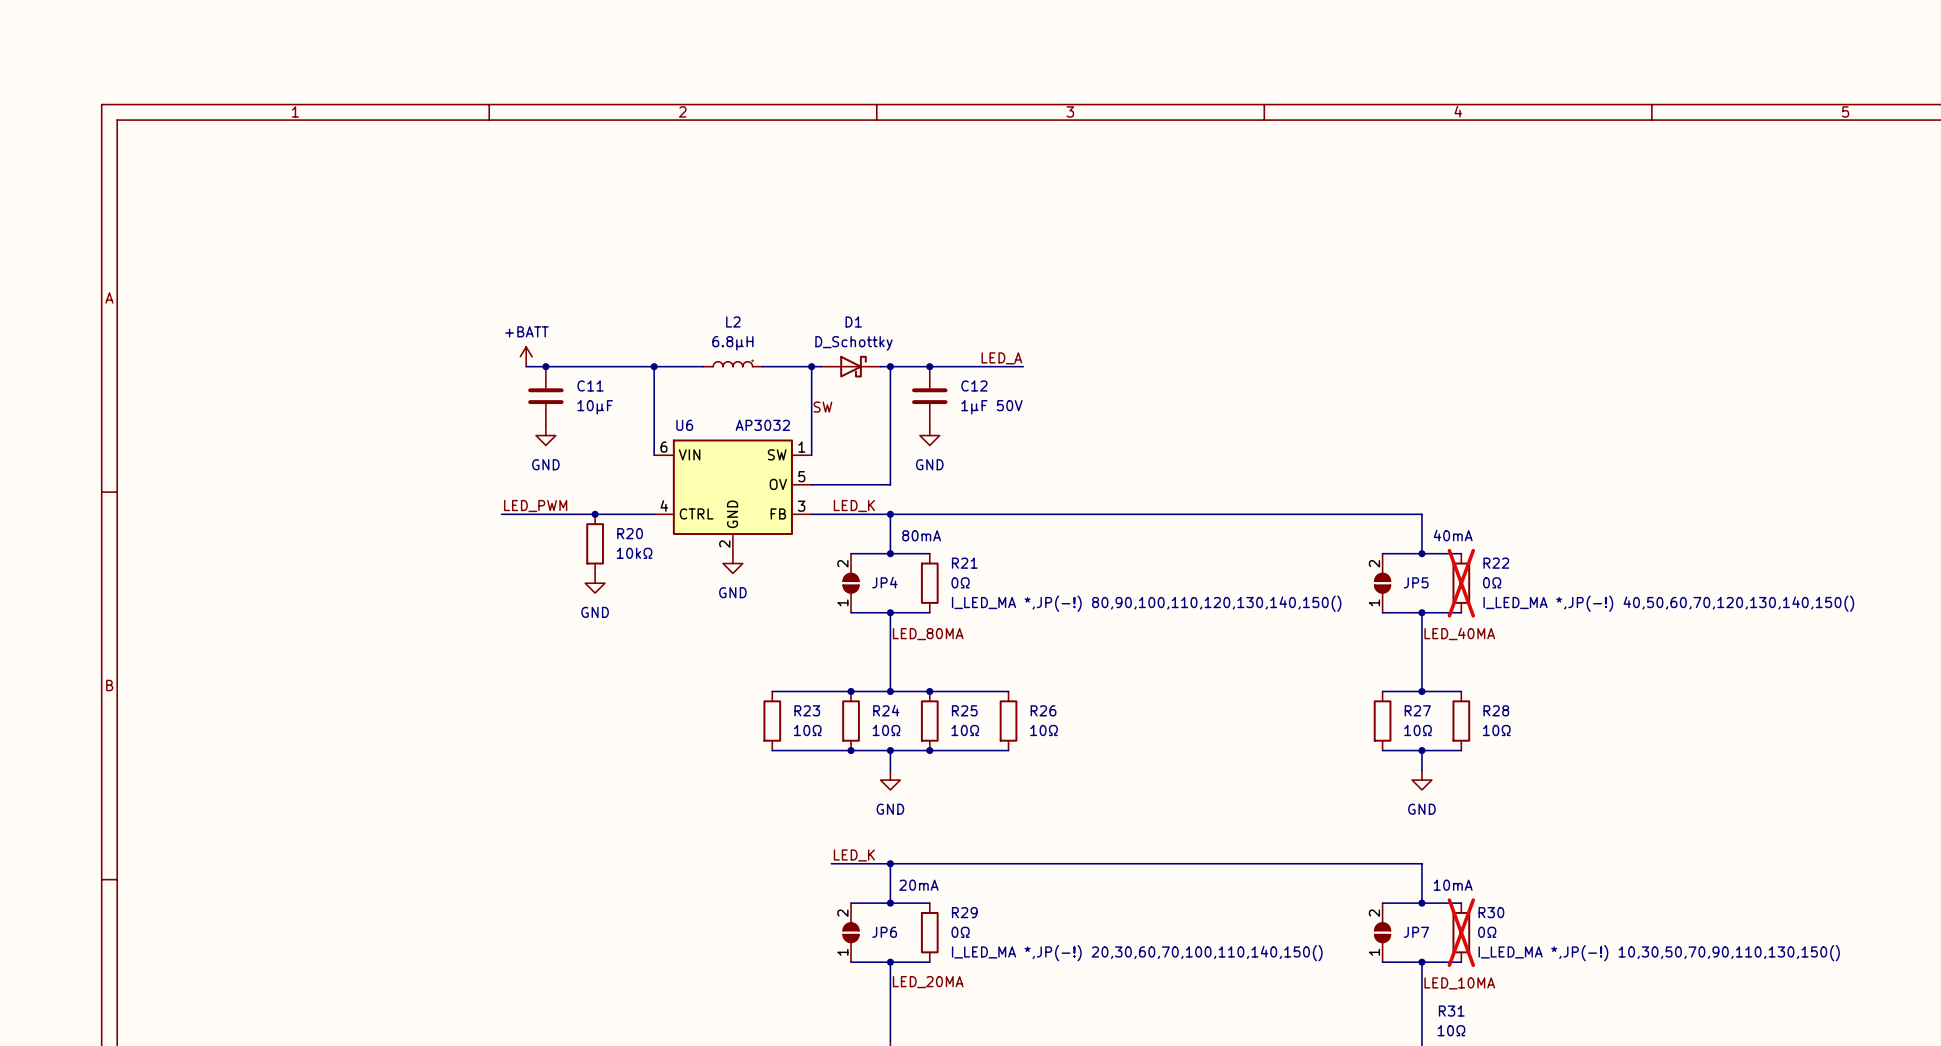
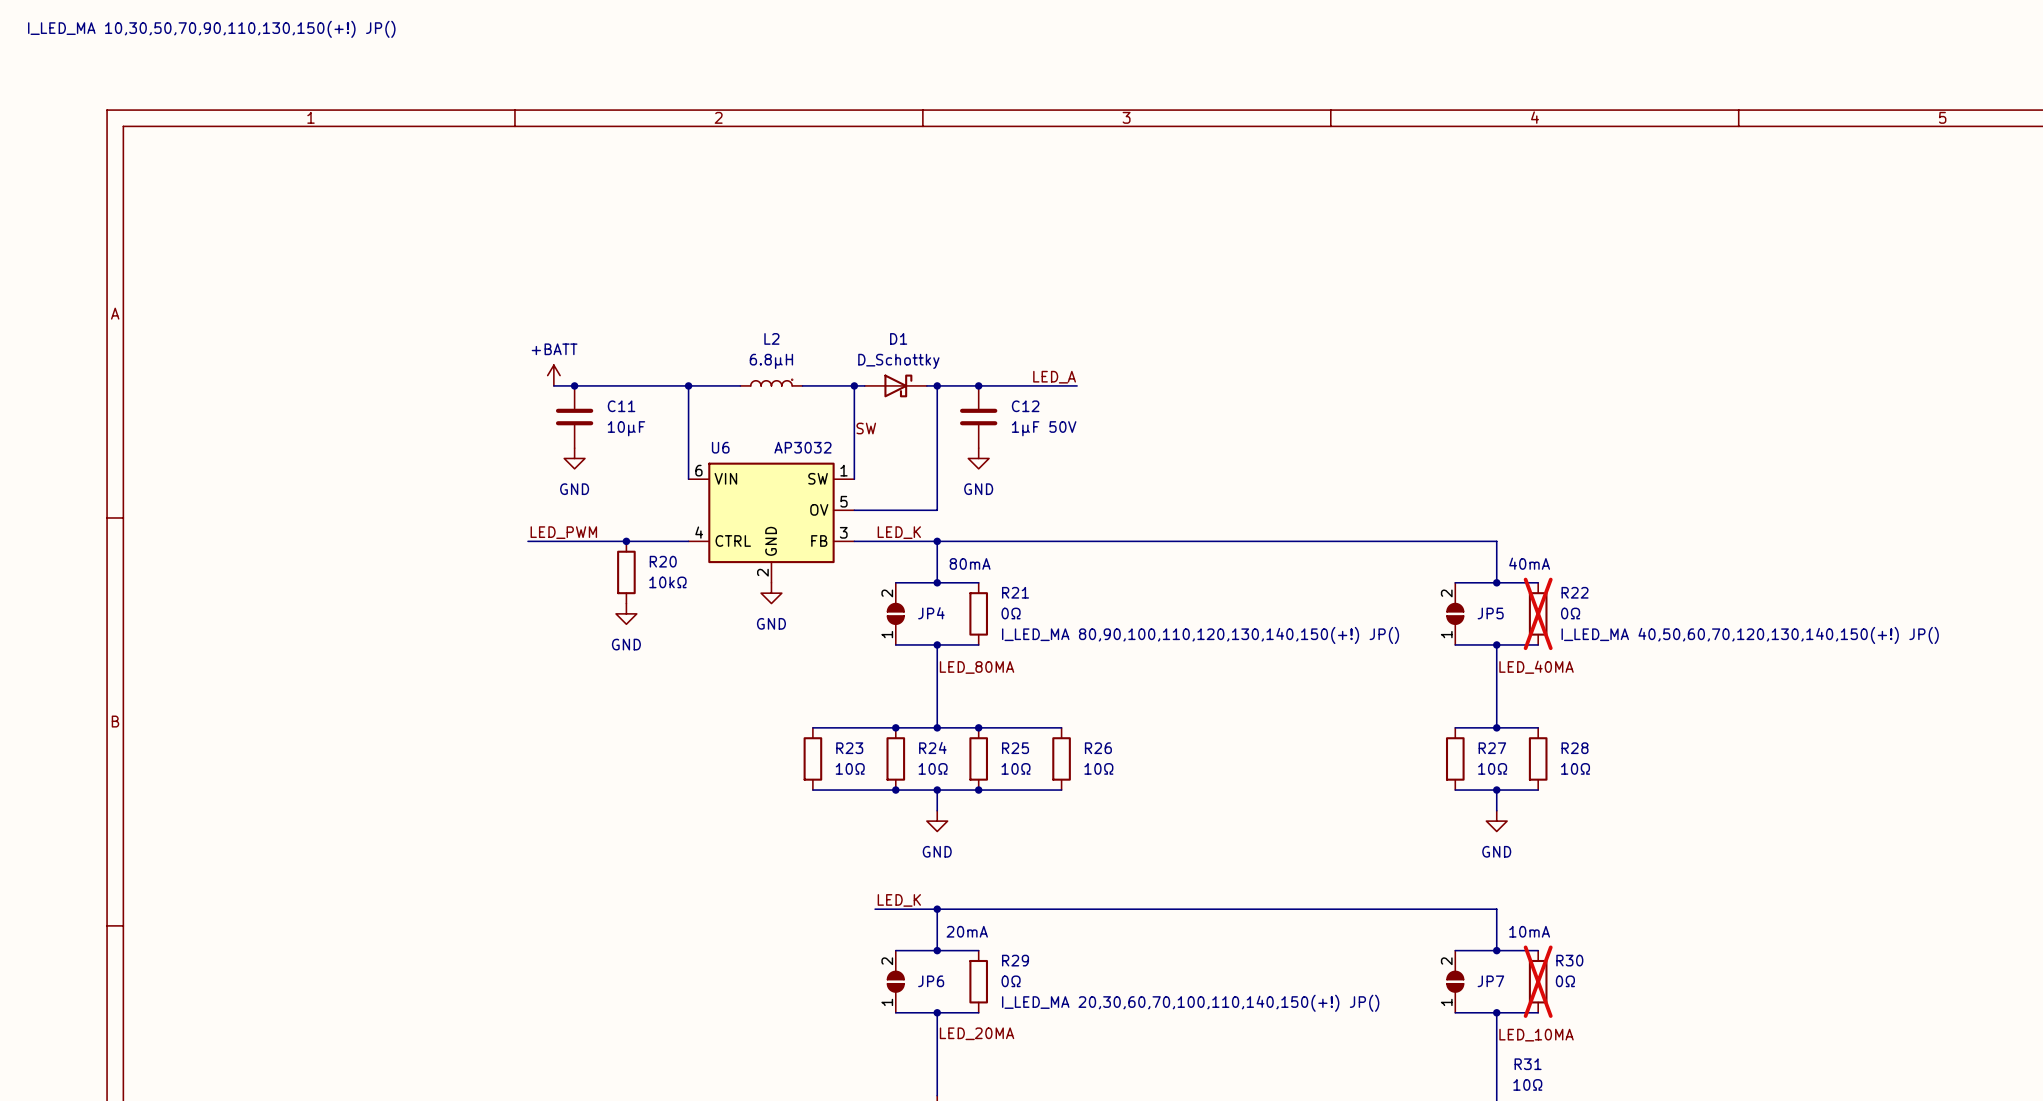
R21 text: I_LED_MA *,JP(-!) 80,90,100,110,120,130,140,150() (1146, 603) -> I_LED_MA 80,90,100,110,120,130,140,150(+!) JP() (1200, 635)
R22 text: I_LED_MA *,JP(-!) 40,50,60,70,120,130,140,150() (1668, 603) -> I_LED_MA 40,50,60,70,120,130,140,150(+!) JP() (1750, 635)
R29 text: I_LED_MA *,JP(-!) 20,30,60,70,100,110,140,150() (1137, 953) -> I_LED_MA 20,30,60,70,100,110,140,150(+!) JP() (1190, 1003)
R30 text: I_LED_MA *,JP(-!) 10,30,50,70,90,110,130,150() (1659, 953) -> I_LED_MA 10,30,50,70,90,110,130,150(+!) JP() (211, 29)

